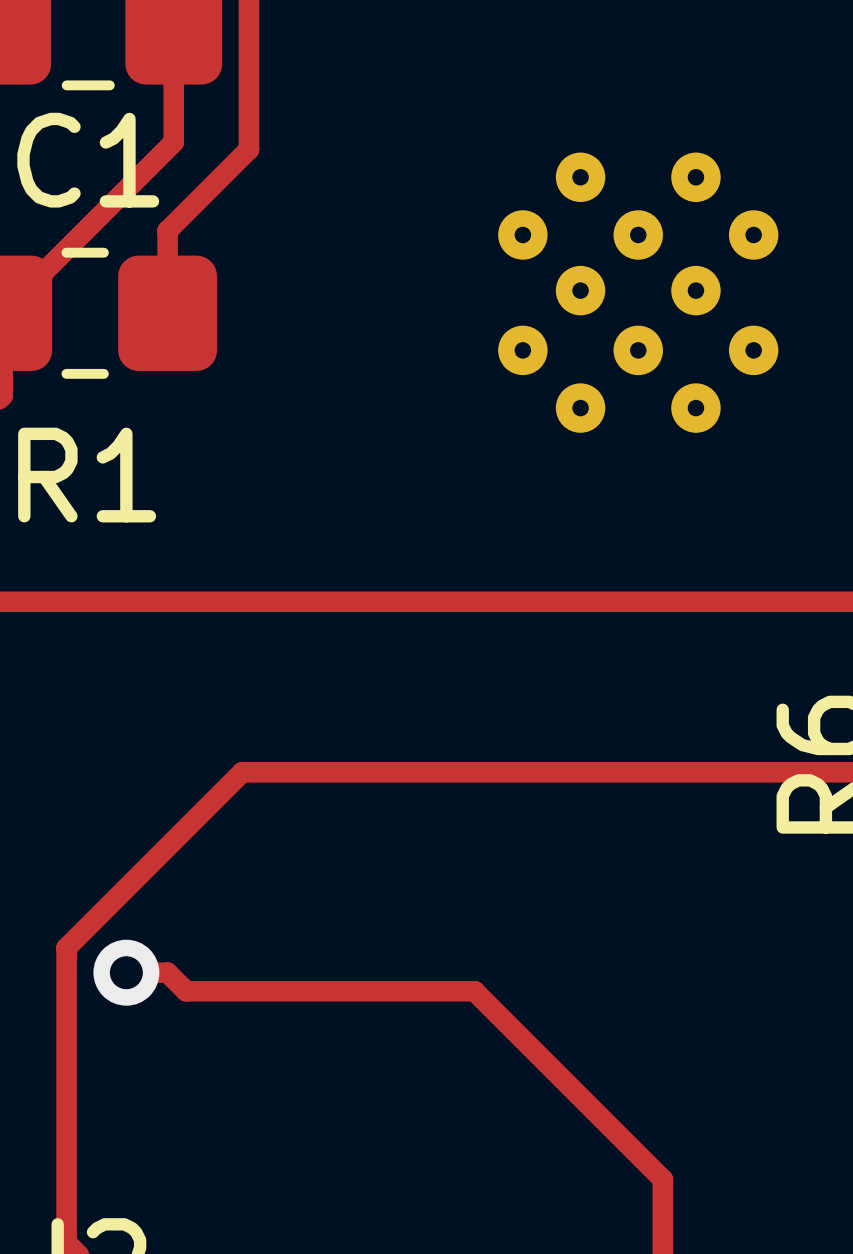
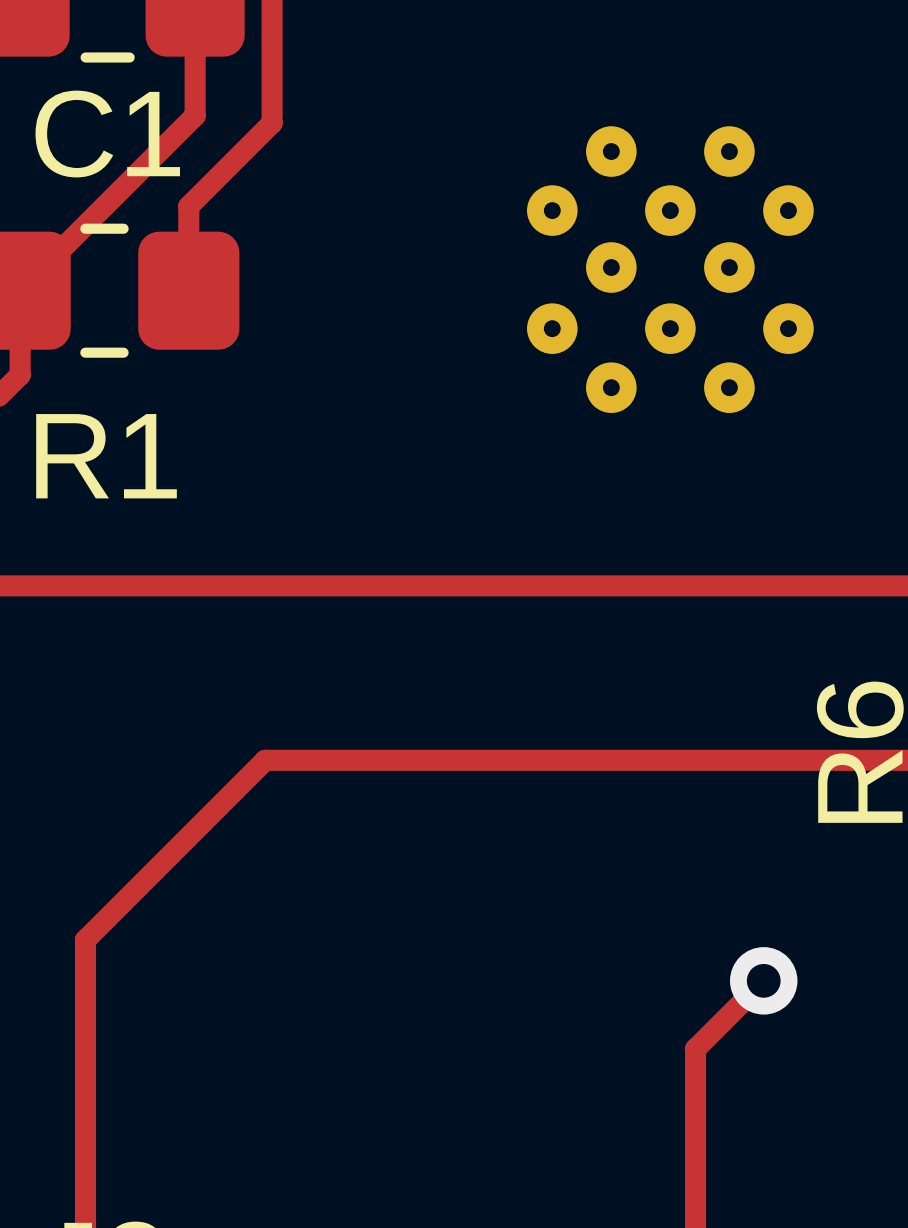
track: (126, 972) (167, 972) (186, 991) (474, 991) (662, 1179) -> (763, 980) (695, 1049) (695, 1176)
via: (126, 972) -> none
via: none -> (763, 980)

